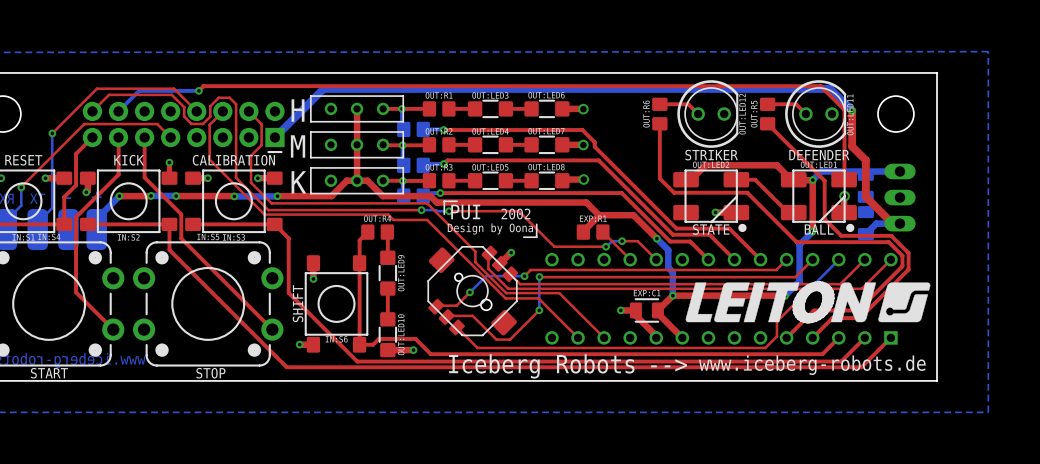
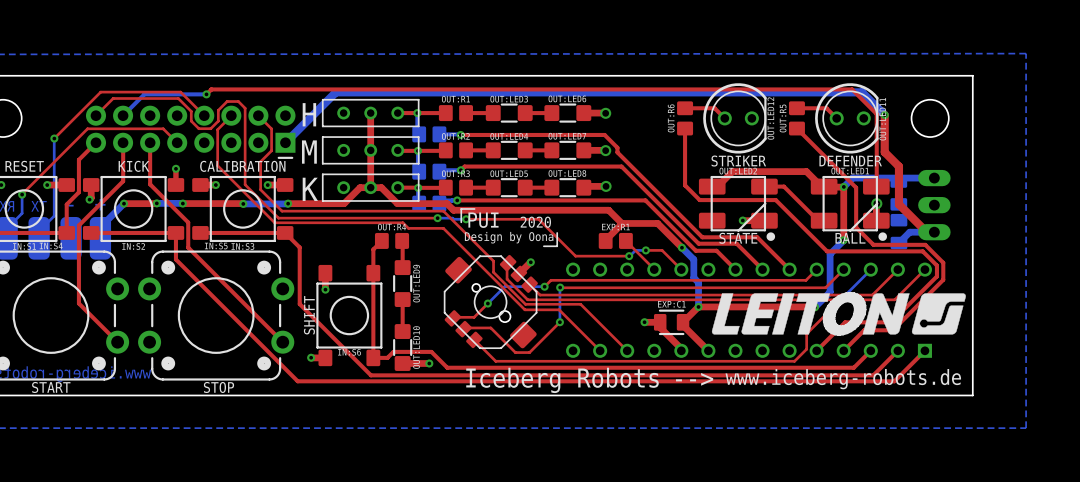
text: 2002 (515, 214) -> 2020 (535, 222)

